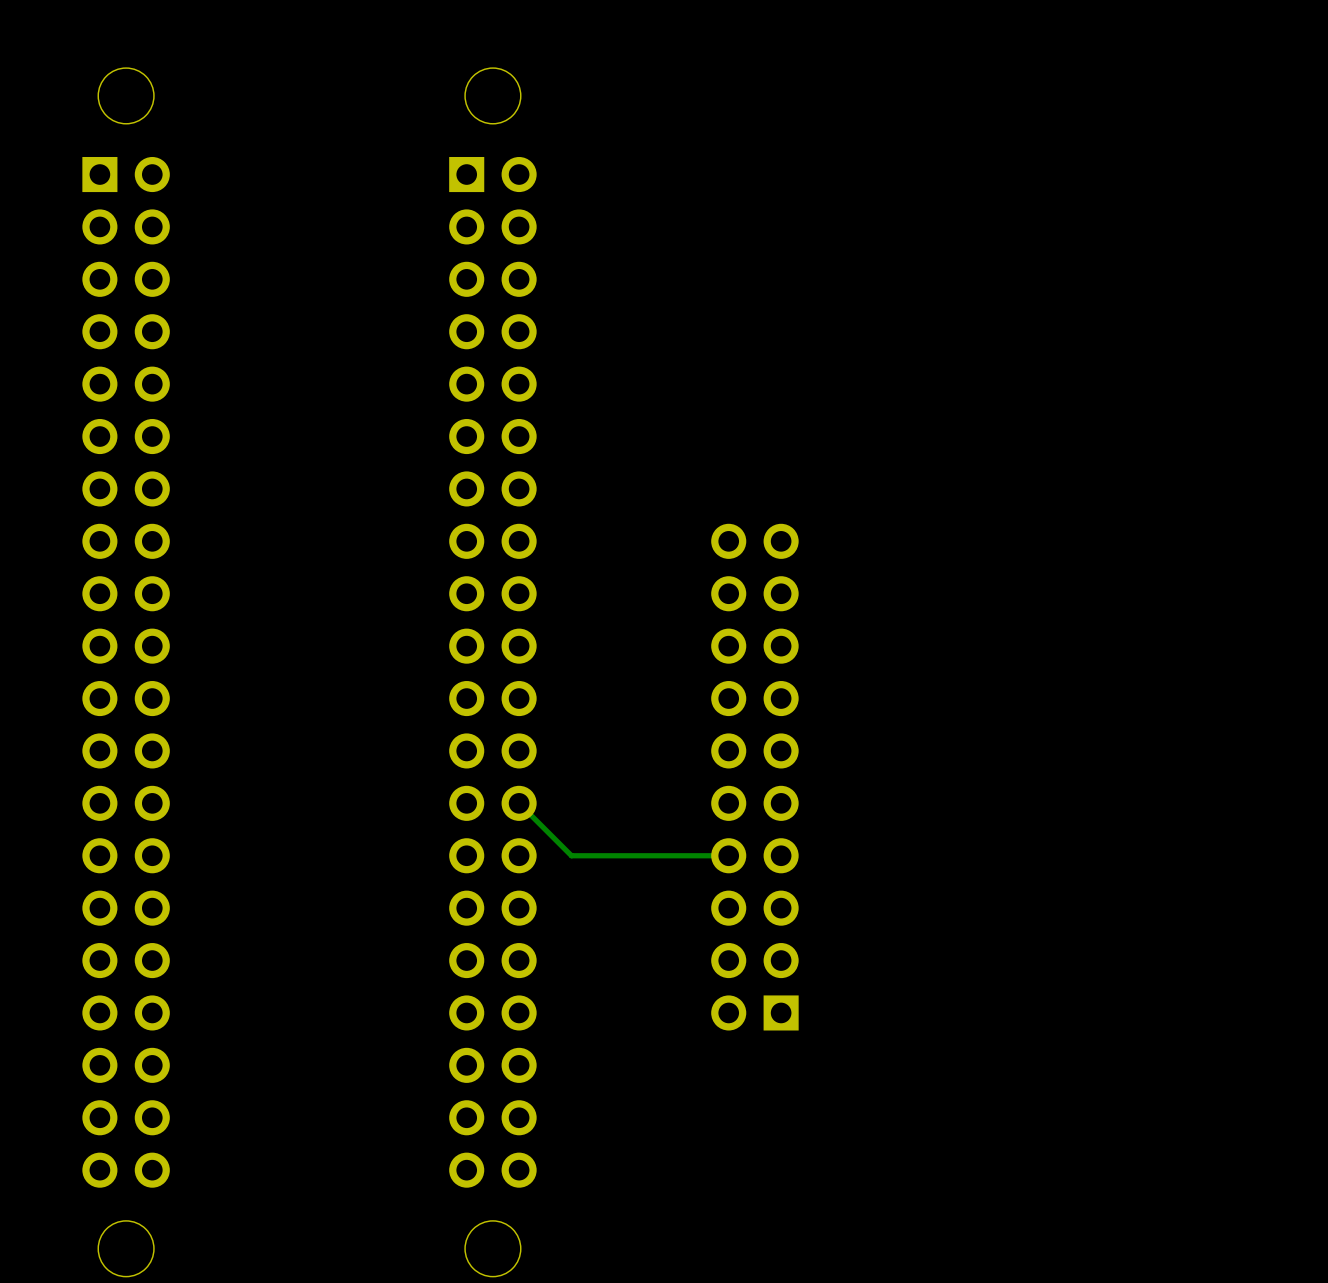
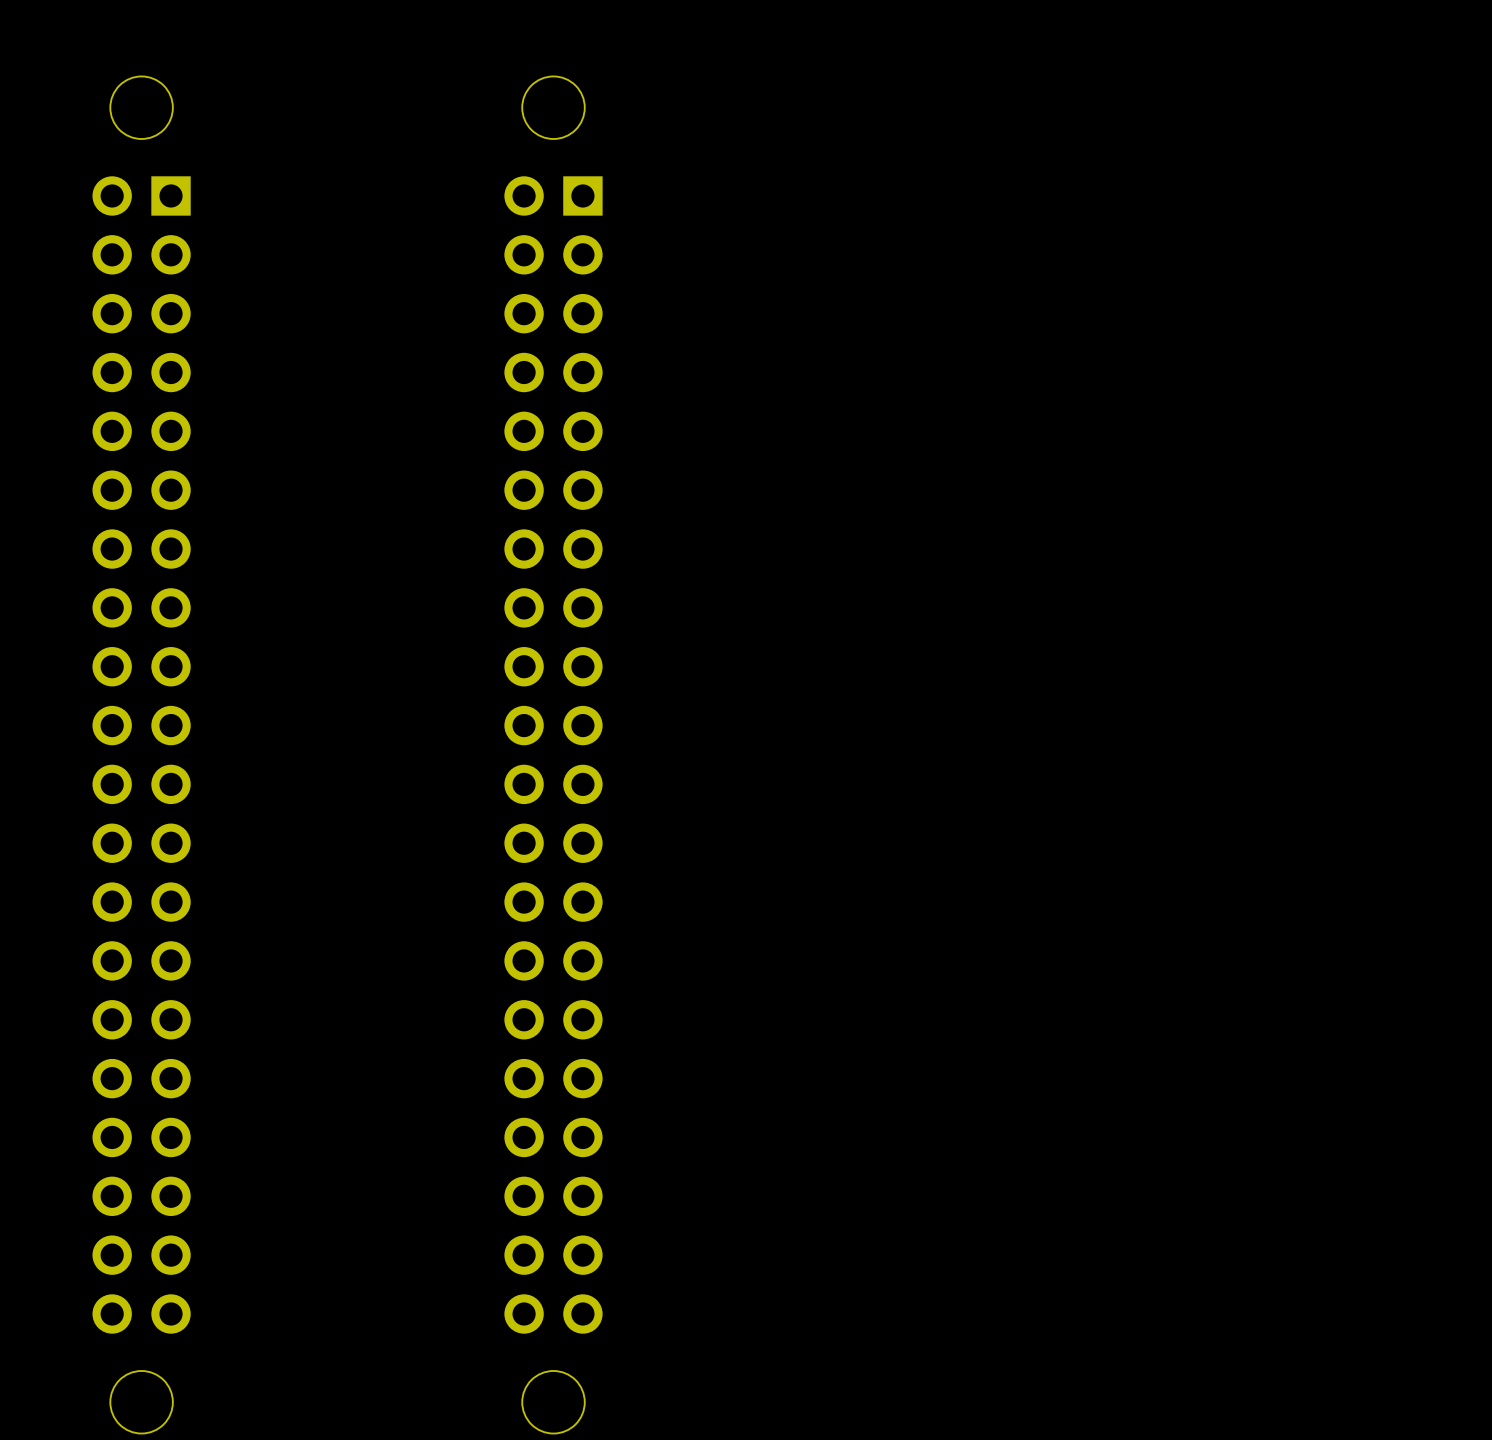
part footprint: [82, 156, 170, 1188] -> [92, 176, 191, 1334]
part footprint: [449, 156, 537, 1188] -> [504, 176, 603, 1334]
part: (754, 777) -> none
track: (519, 803) (571, 855) (728, 855) -> none

